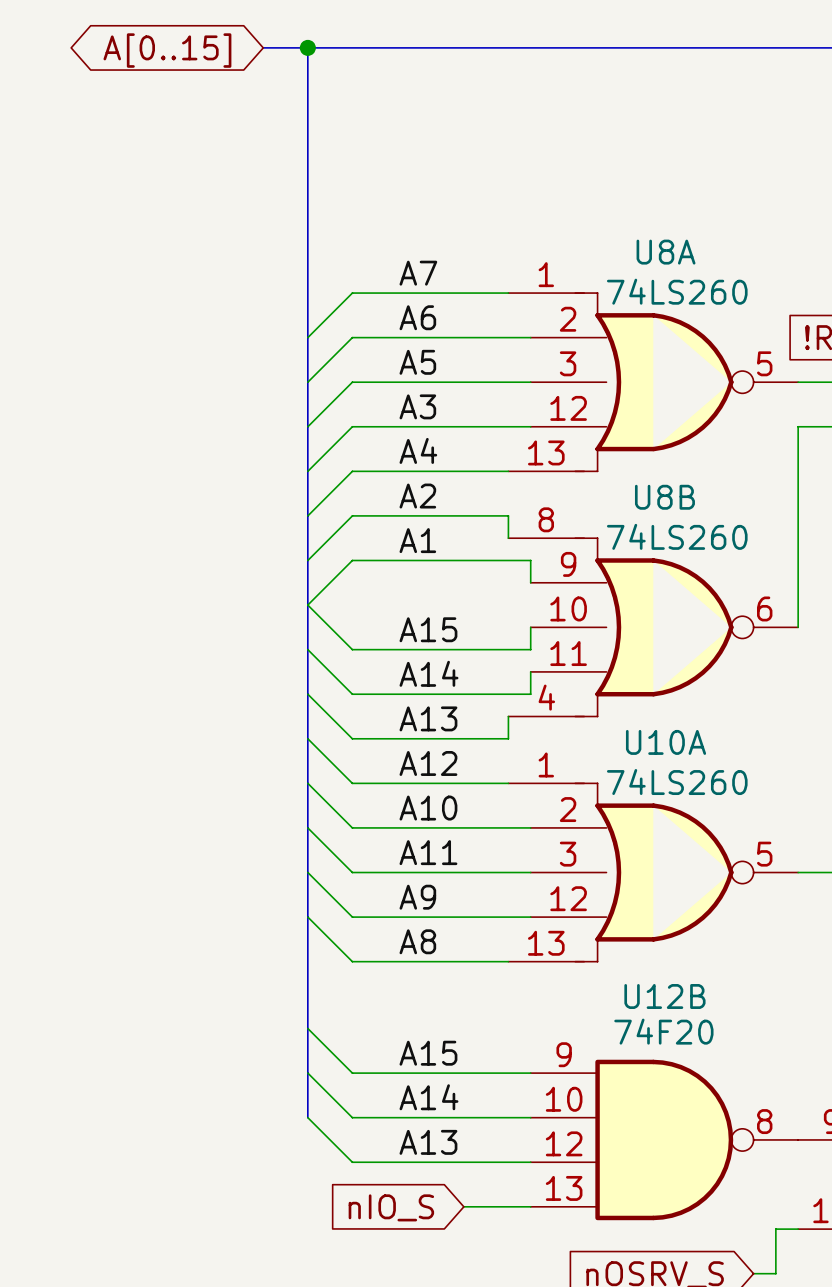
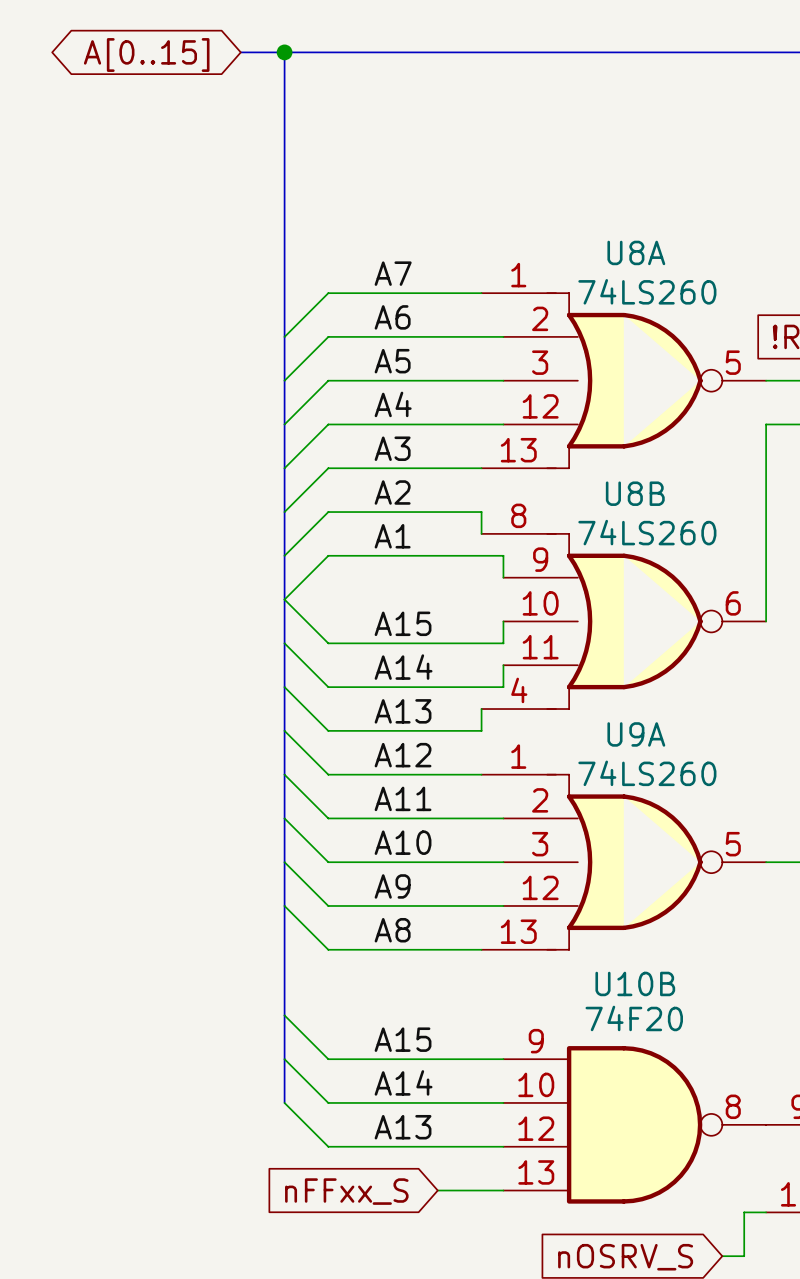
label: A3 (417, 406) -> A4 (393, 404)
label: A4 (418, 450) -> A3 (392, 448)
U10A name: U10A (666, 742) -> U9A (636, 734)
label: A10 (428, 808) -> A11 (403, 798)
label: A11 (428, 852) -> A10 (403, 842)
U12B name: U12B (664, 996) -> U10B (635, 983)
global label: nIO_S (391, 1207) -> nFFxx_S (346, 1191)

